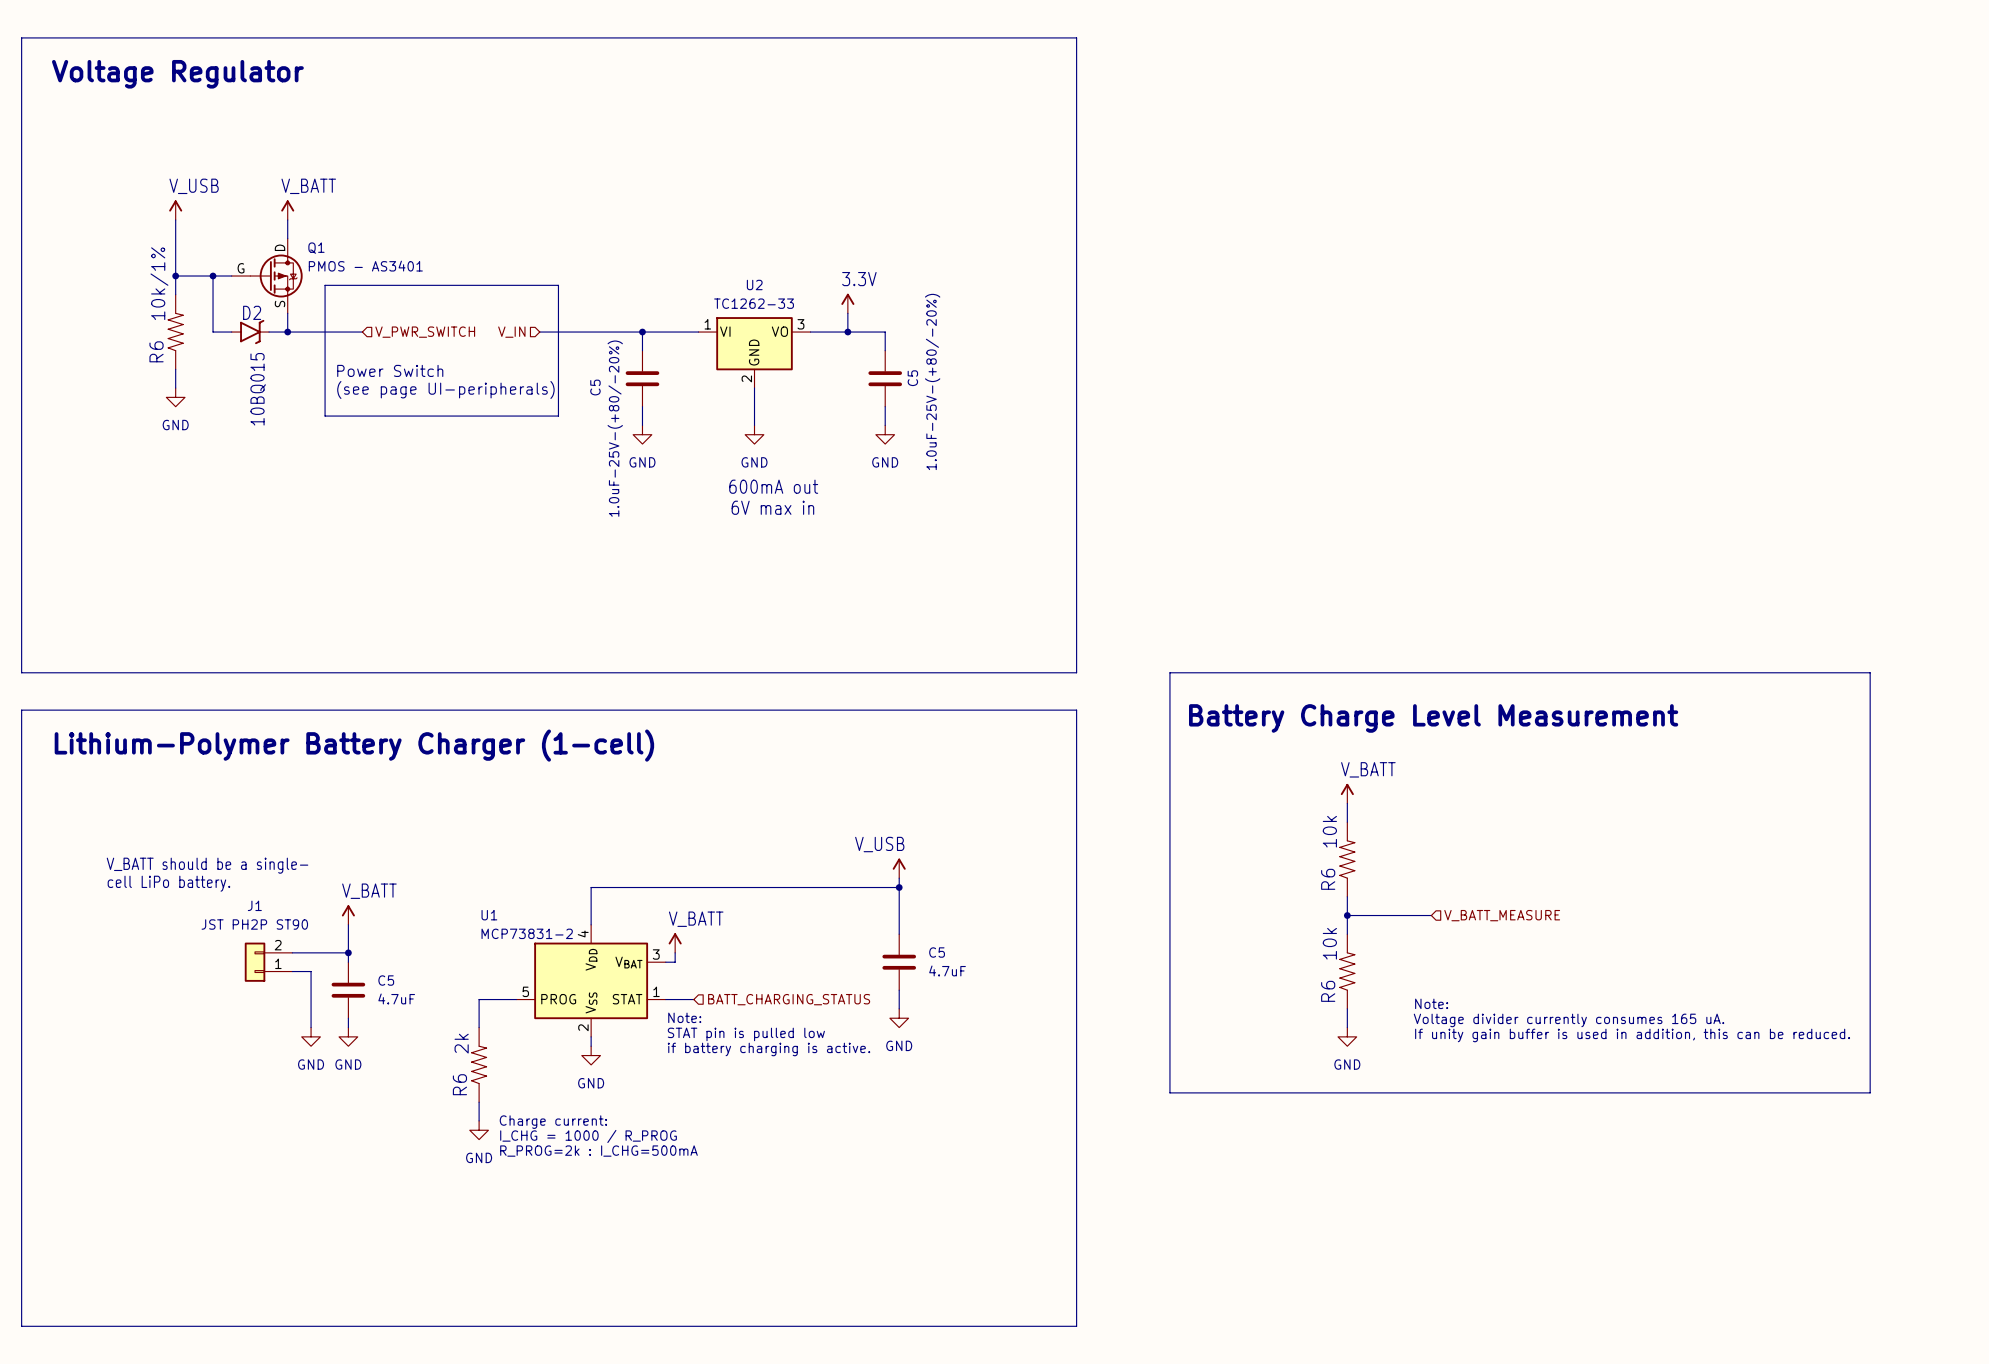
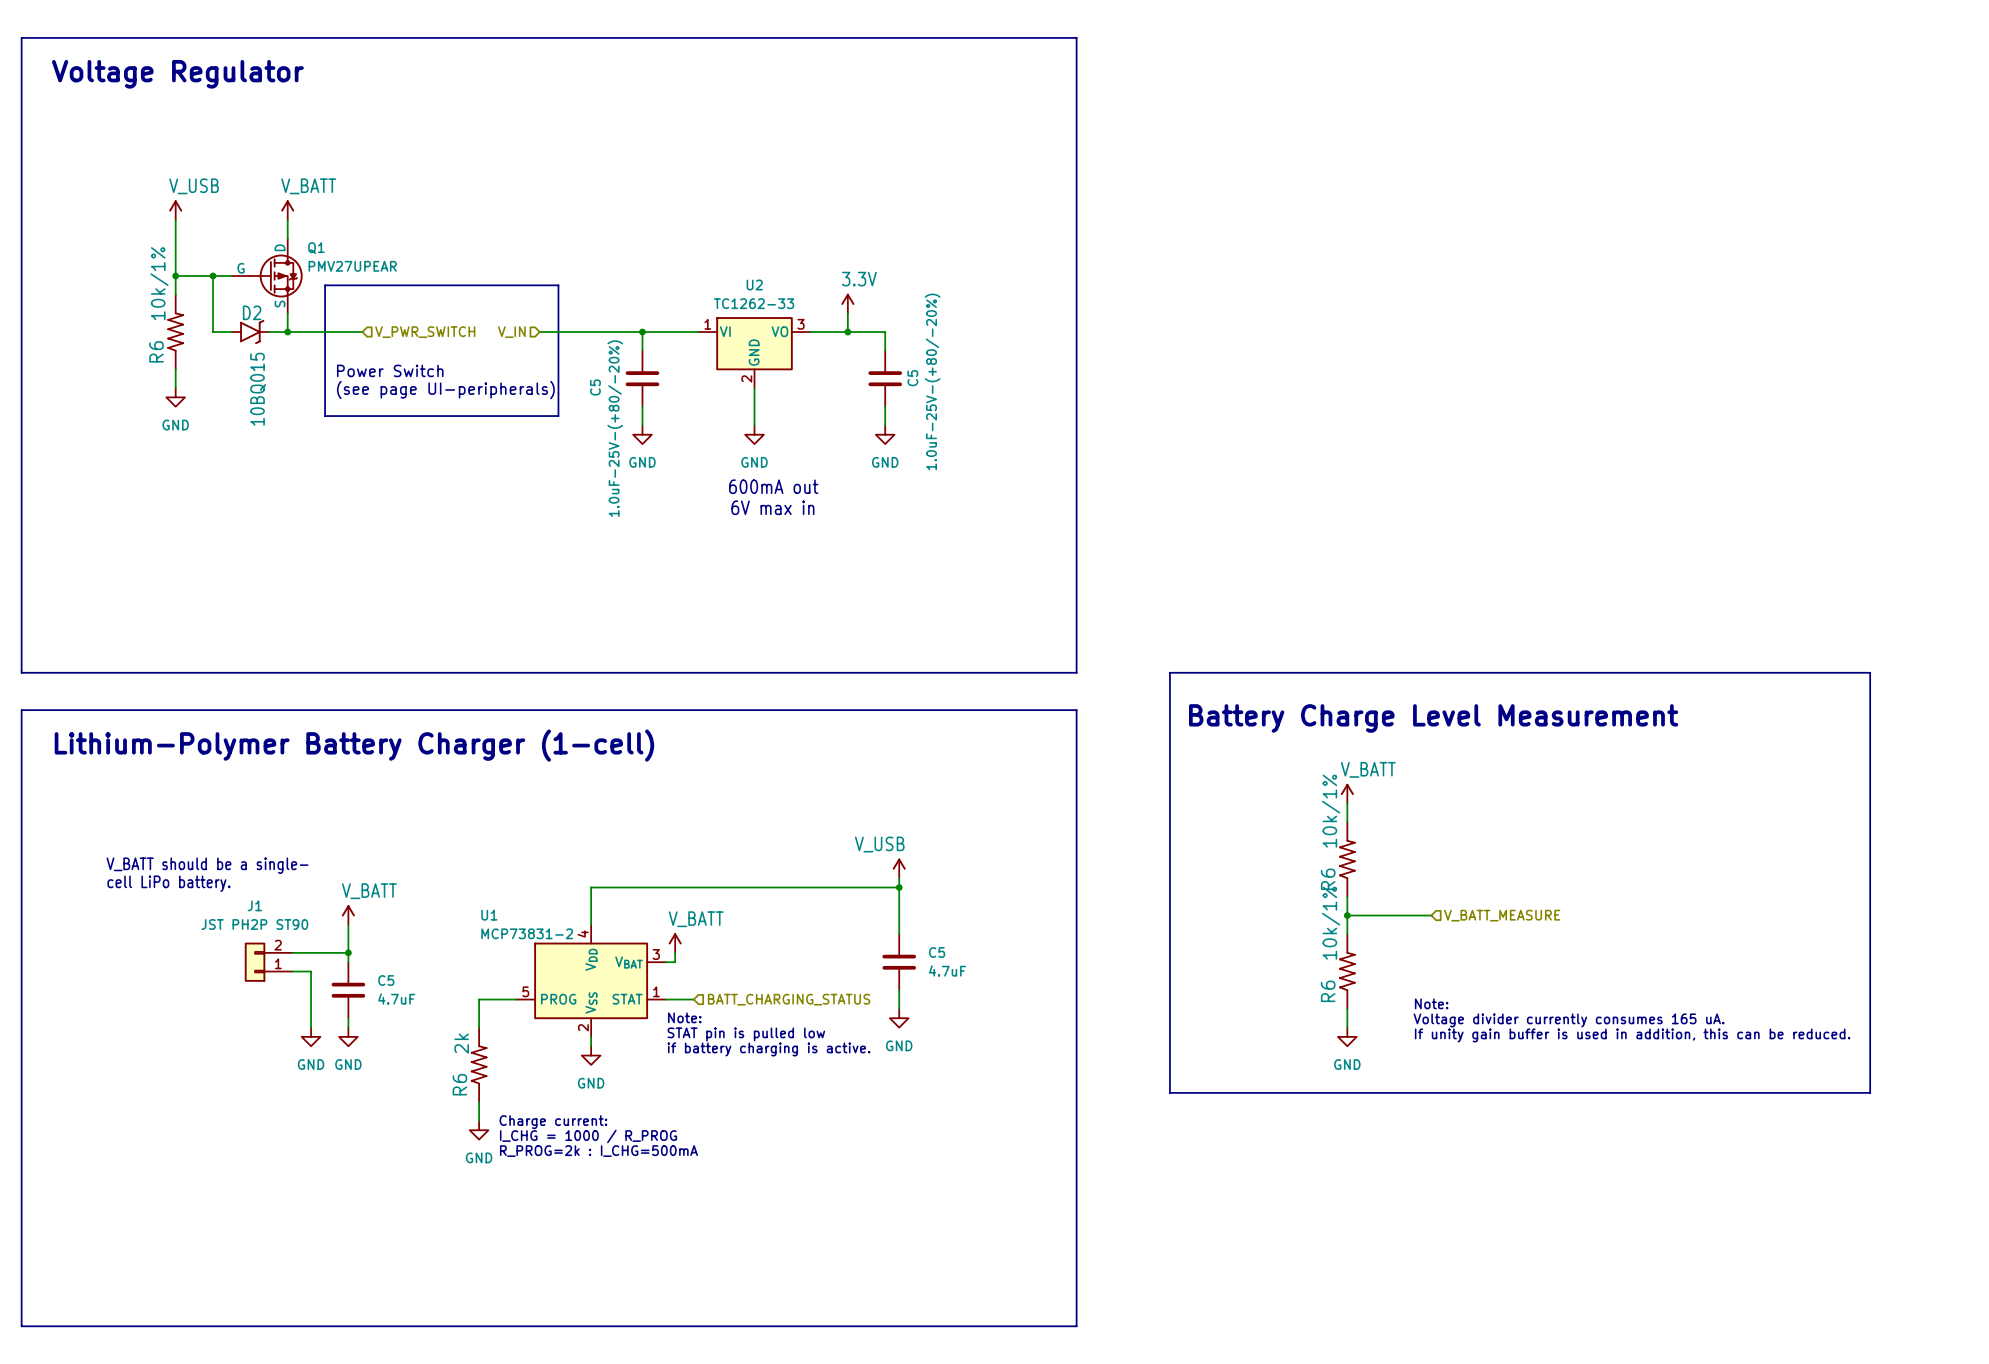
Q1 value: PMOS - AS3401 (365, 266) -> PMV27UPEAR (352, 266)
R6 value: 10k (1329, 831) -> 10k/1% (1331, 811)
R6 value: 10k (1329, 943) -> 10k/1% (1331, 923)

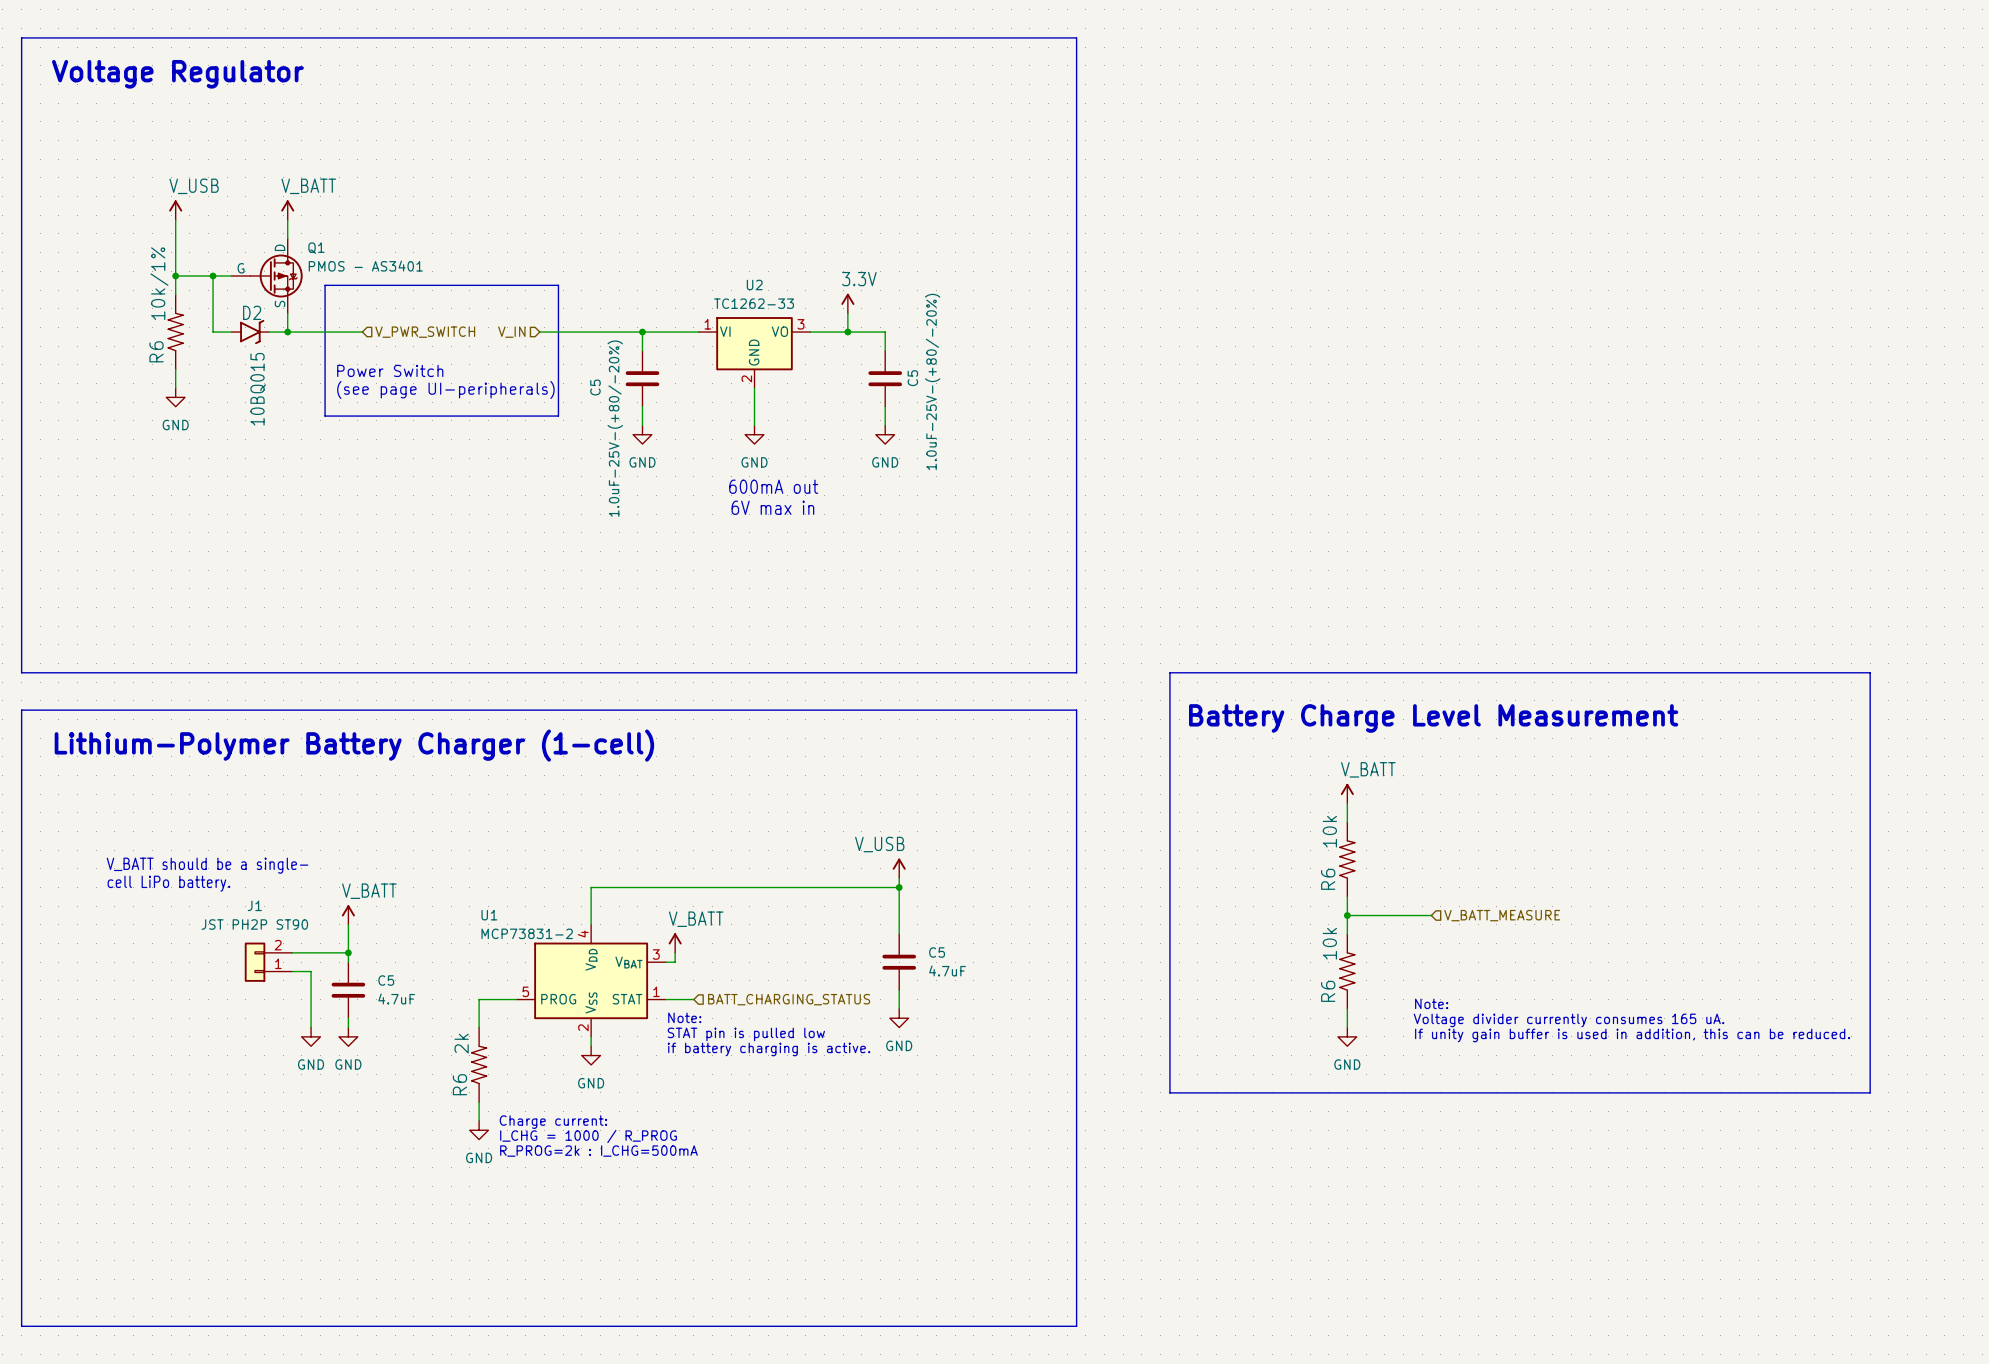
Q1 value: PMV27UPEAR (352, 266) -> PMOS - AS3401 (365, 266)
R6 value: 10k/1% (1331, 811) -> 10k (1329, 831)
R6 value: 10k/1% (1331, 923) -> 10k (1329, 943)

